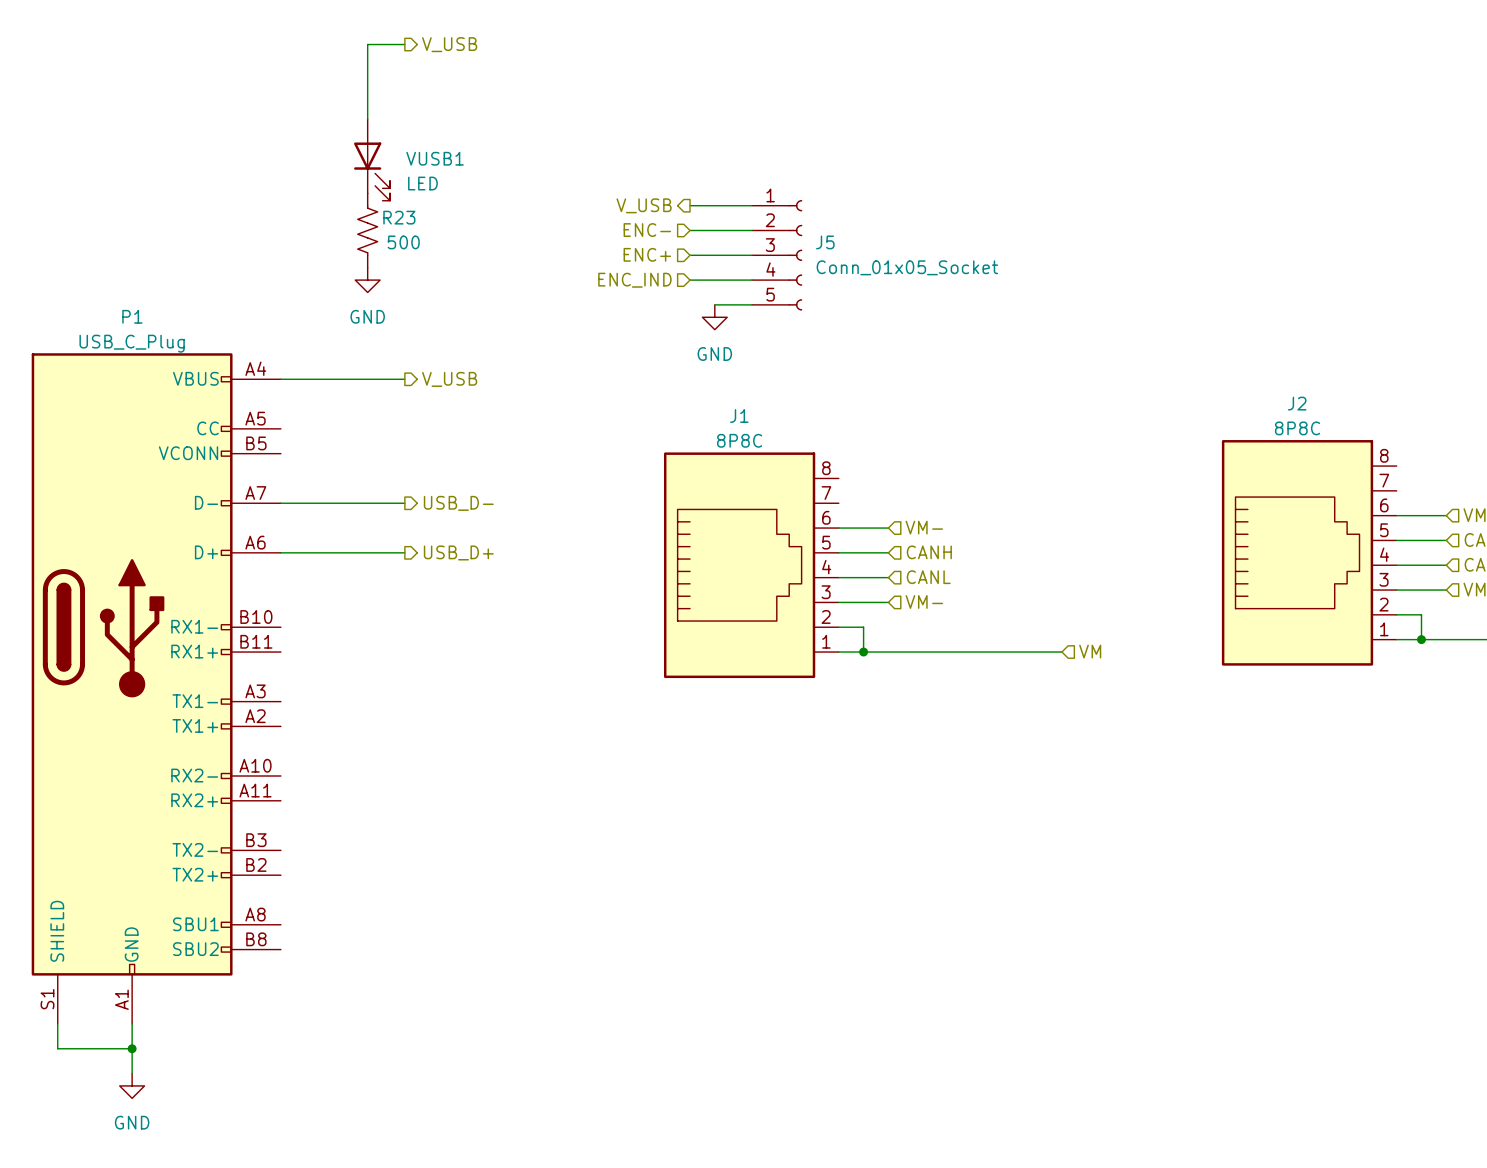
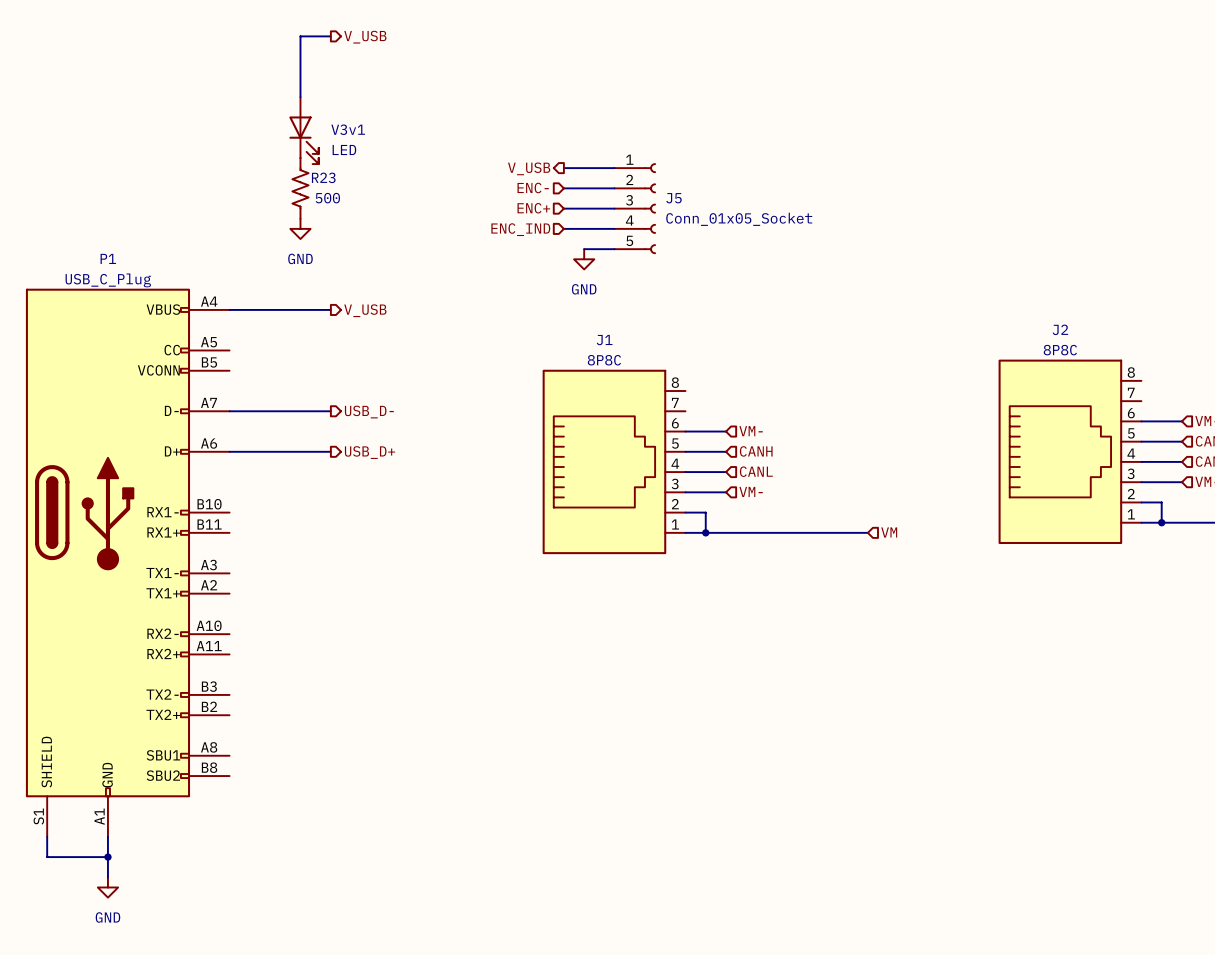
VUSB1 name: VUSB1 (435, 158) -> V3v1 (348, 129)

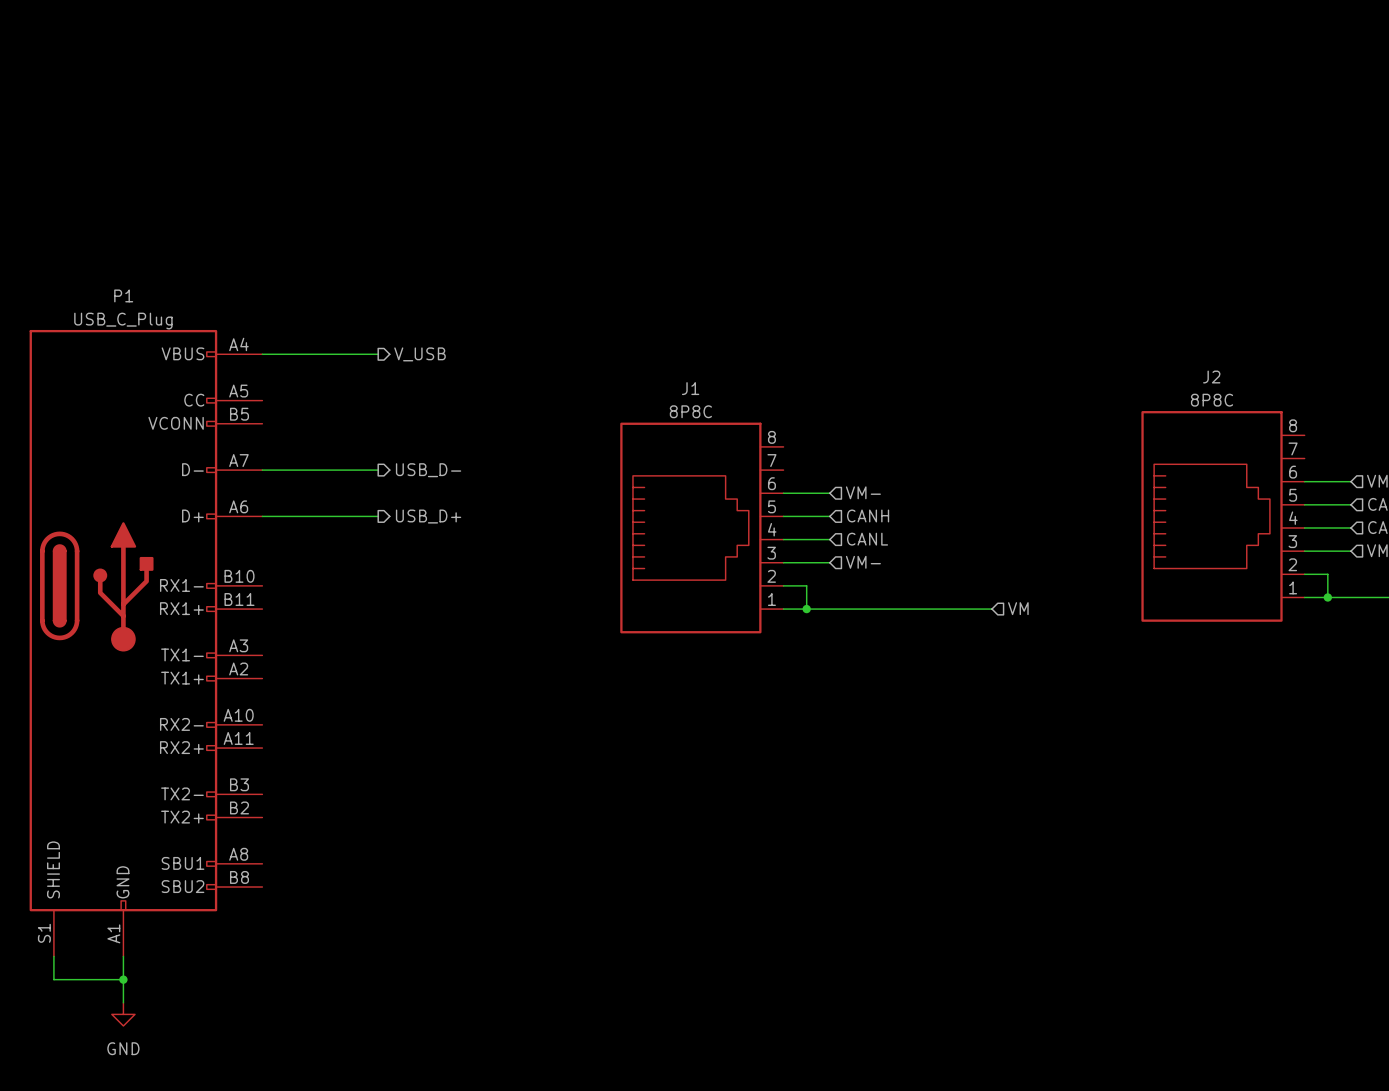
wire: (330, 36) (300, 36) (300, 97) -> none
hierarchical label: V_USB (365, 37) -> none
V3v1: LED (304, 130) -> none
hierarchical label: V_USB (529, 168) -> none
wire: (563, 168) (614, 168) -> none
hierarchical label: ENC- (533, 187) -> none
R23: 500 (300, 188) -> none
wire: (563, 188) (614, 188) -> none
hierarchical label: ENC+ (533, 208) -> none
wire: (563, 208) (614, 208) -> none
J5: Conn_01x05_Socket (635, 208) -> none
power symbol: GND (300, 228) -> none
wire: (563, 228) (614, 228) -> none
hierarchical label: ENC_IND (520, 229) -> none
wire: (584, 249) (614, 249) -> none
power symbol: GND (584, 259) -> none

